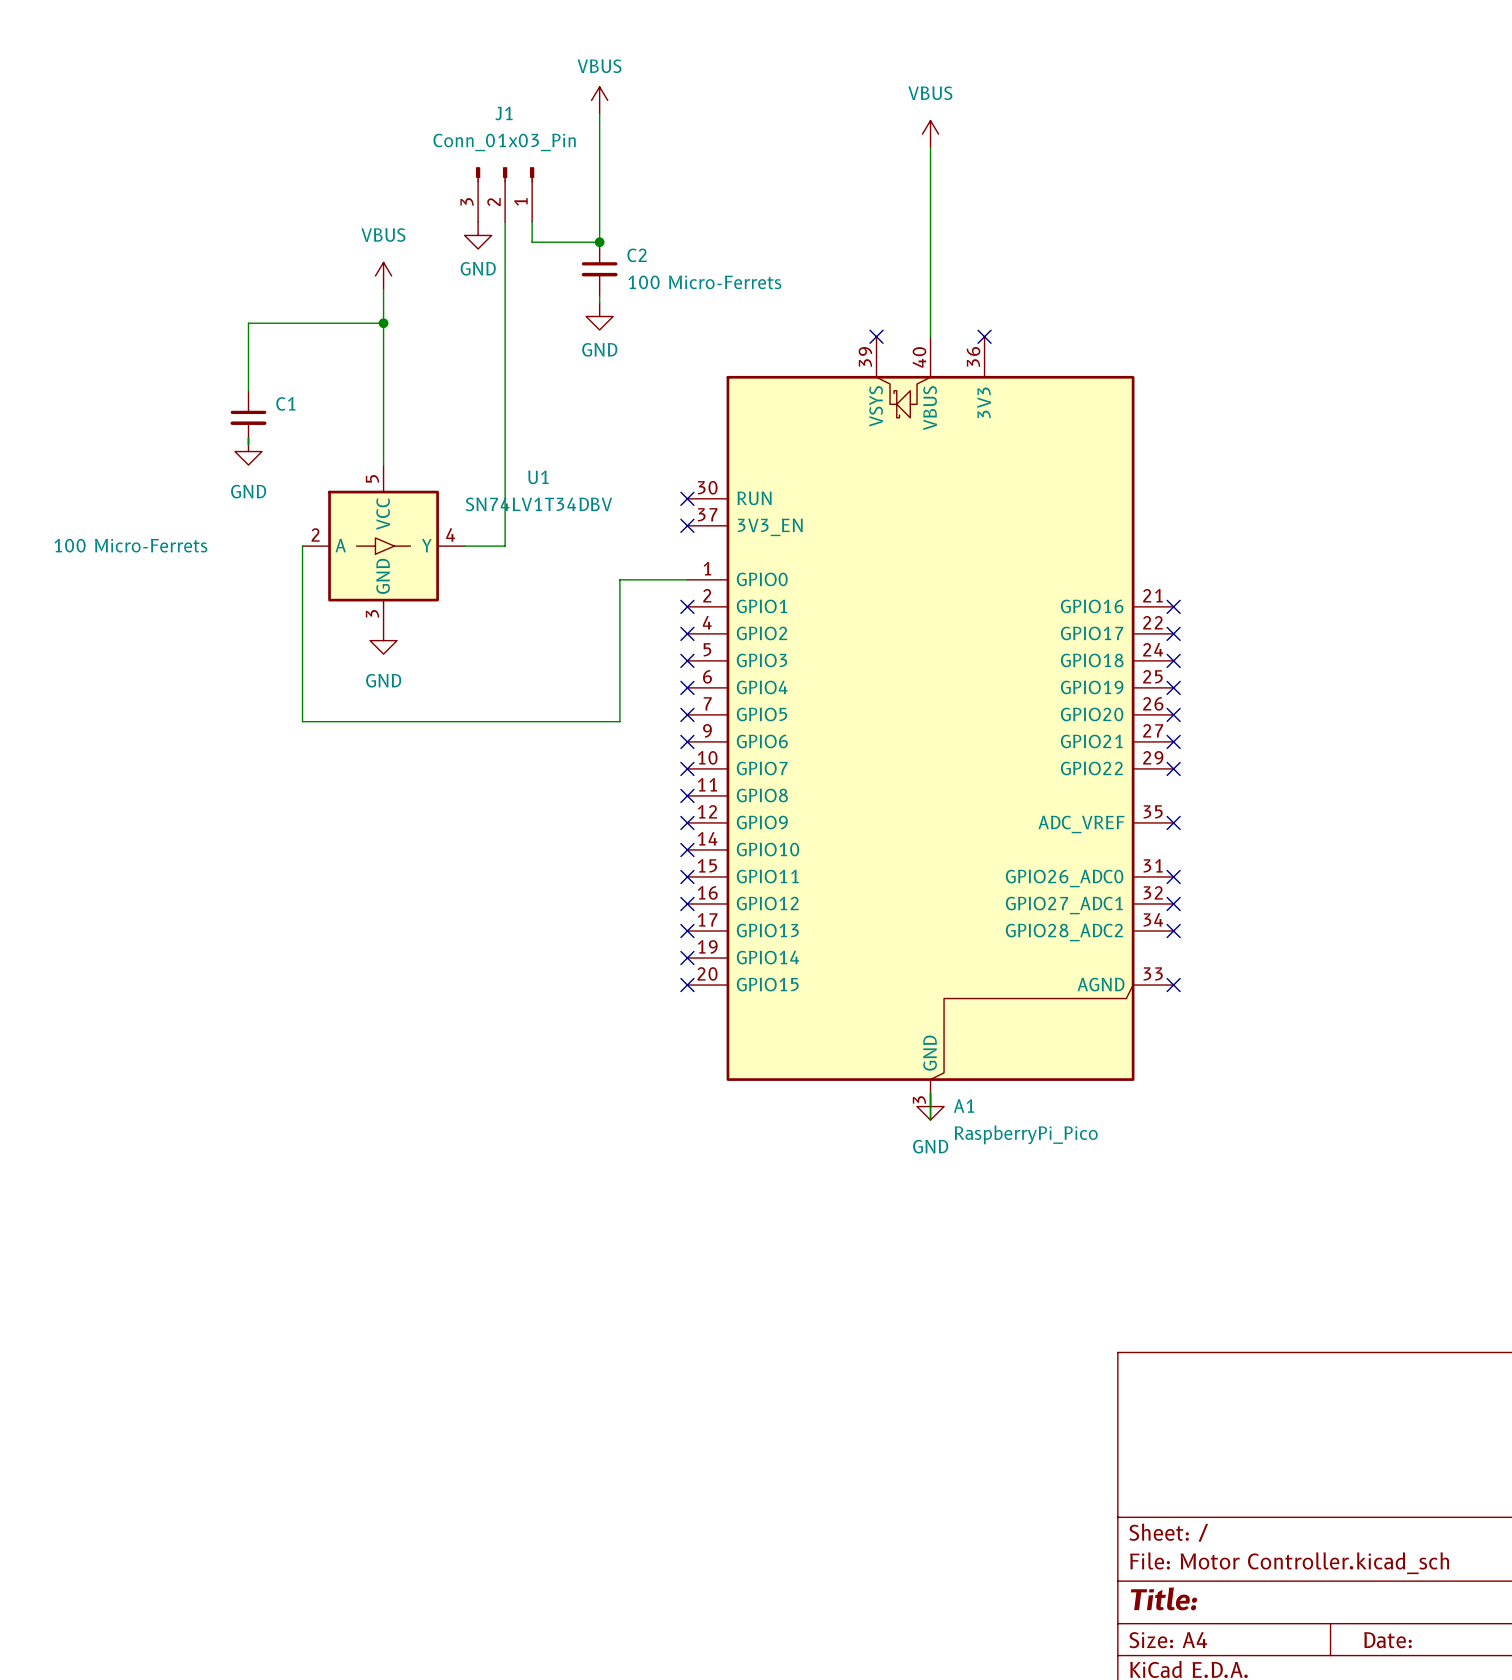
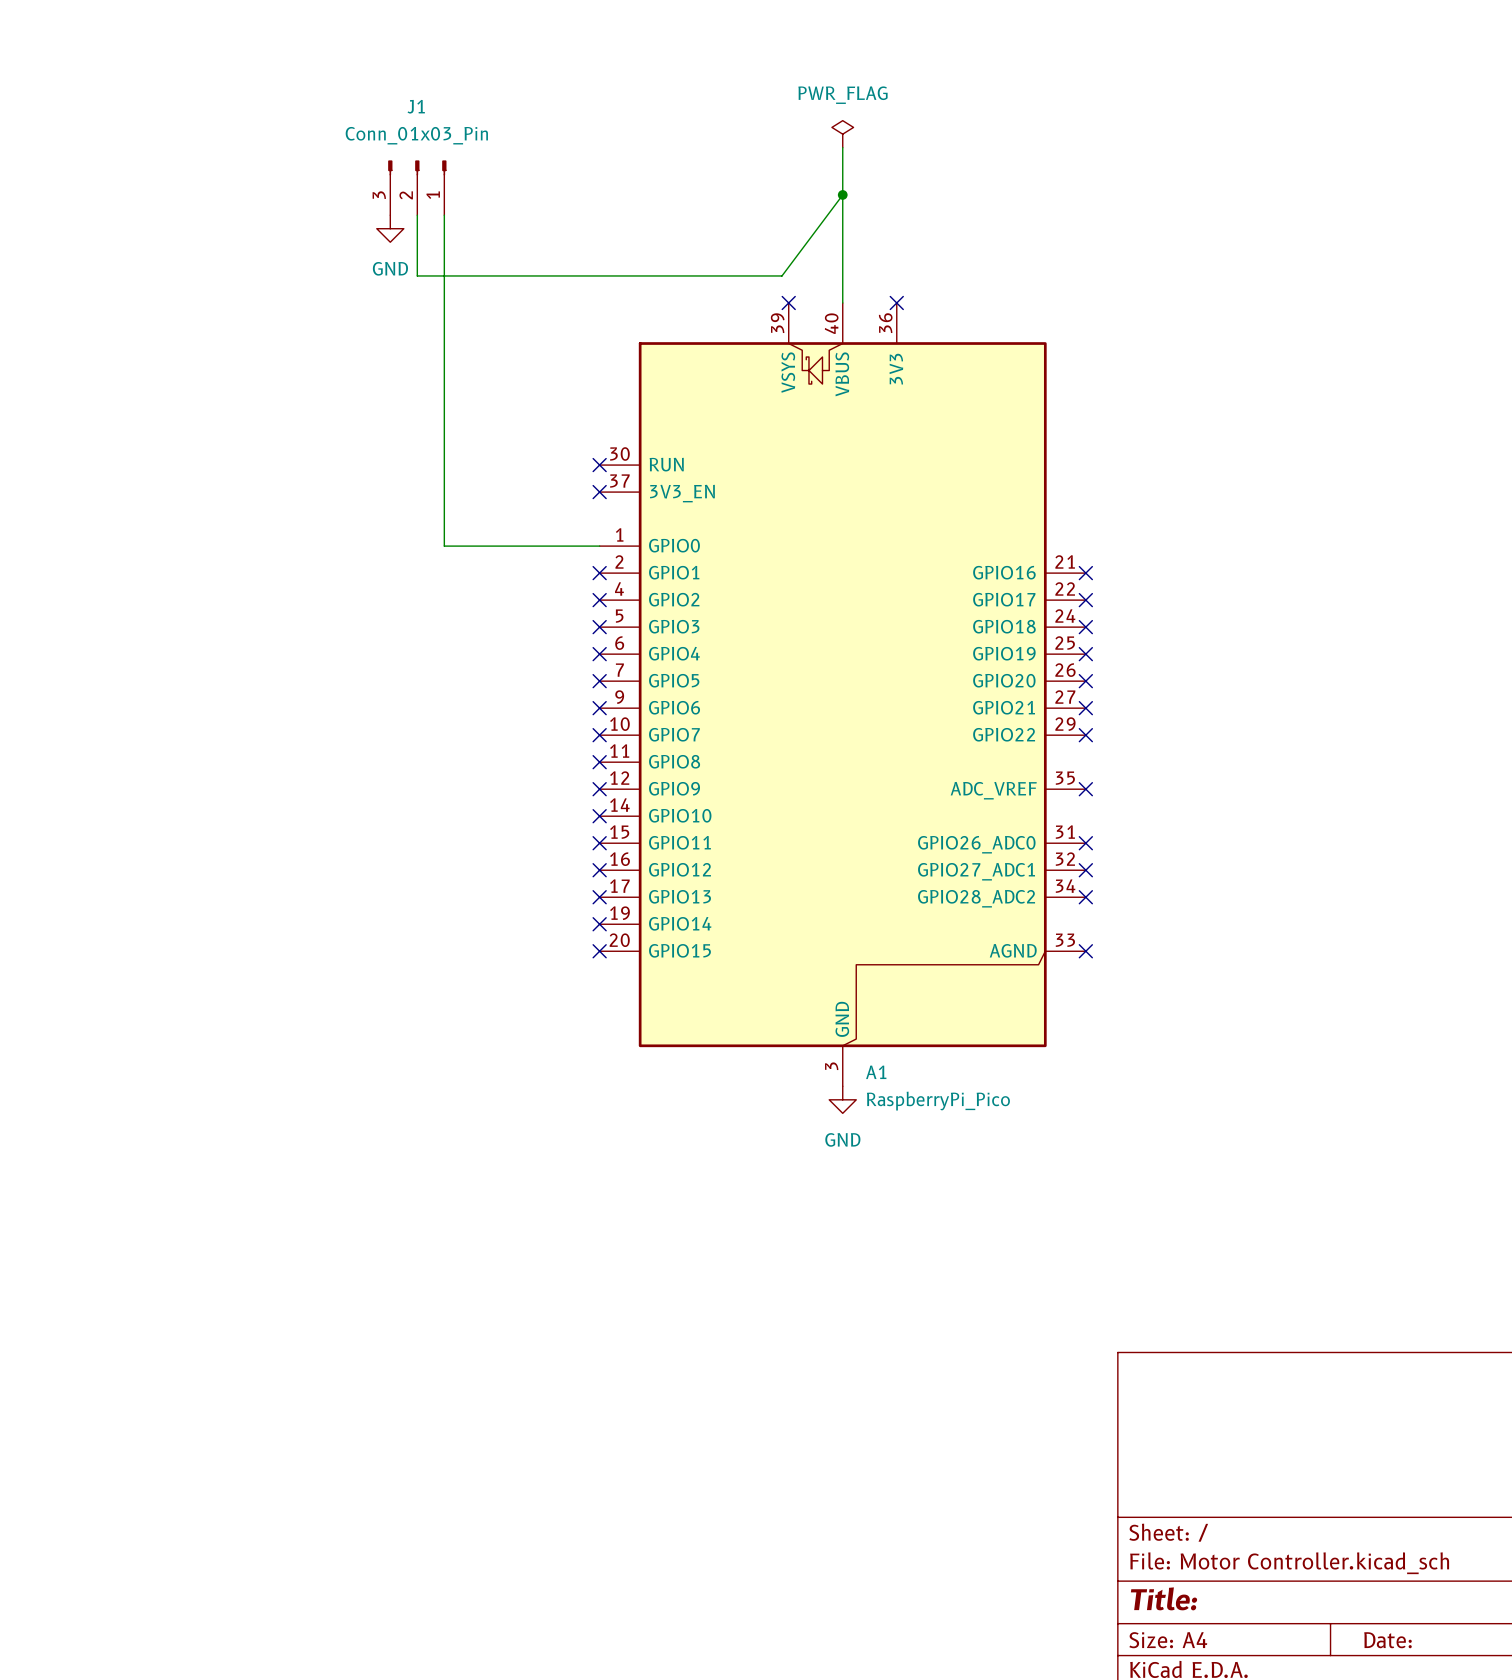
power symbol: VBUS (599, 100) -> none
wire: (599, 113) (599, 242) (532, 242) (532, 221) -> none
power symbol: none -> PWR_FLAG (842, 134)
power symbol: VBUS (930, 134) -> none
wire: none -> (842, 147) (842, 302)
wire: (930, 147) (930, 336) -> none
J1 position: (505, 194) -> (417, 187)
wire: none -> (842, 194) (781, 275) (417, 275) (417, 215)
junction: none -> (842, 194)
wire: none -> (444, 215) (444, 546) (464, 546)
wire: (505, 221) (505, 546) -> (599, 546) (505, 546)
power symbol position: GND (478, 235) -> GND (390, 228)
junction: (599, 242) -> none
power symbol text position: GND (478, 268) -> GND (390, 268)
C2: 100 Micro-Ferrets (599, 269) -> none
power symbol: VBUS (383, 275) -> none
wire: (383, 289) (383, 465) -> none
wire: (599, 296) (599, 302) -> none
no-connect mark: none -> (788, 302)
power symbol: GND (599, 316) -> none
wire: (383, 323) (248, 323) (248, 390) -> none
junction: (383, 323) -> none
no-connect mark position: (876, 336) -> (896, 302)
no-connect mark: (984, 336) -> none
C1: 100 Micro-Ferrets (248, 417) -> none
wire: (248, 438) (248, 444) -> none
power symbol: GND (248, 451) -> none
no-connect mark: none -> (599, 465)
no-connect mark: none -> (599, 492)
no-connect mark: (687, 498) -> none
no-connect mark: (687, 525) -> none
wire: (302, 546) (302, 721) (619, 721) (619, 579) (687, 579) -> none
U1: SN74LV1T34DBV (383, 546) -> none
no-connect mark: none -> (599, 573)
no-connect mark: none -> (1085, 573)
no-connect mark: none -> (599, 600)
no-connect mark: none -> (1085, 600)
no-connect mark: (687, 606) -> none
no-connect mark: (1173, 606) -> none
no-connect mark: none -> (599, 627)
no-connect mark: none -> (1085, 627)
no-connect mark: (687, 633) -> none
no-connect mark: (1173, 633) -> none
power symbol: GND (383, 640) -> none
no-connect mark: none -> (599, 654)
no-connect mark: none -> (1085, 654)
no-connect mark: (687, 660) -> none
no-connect mark: (1173, 660) -> none
no-connect mark: none -> (599, 681)
no-connect mark: none -> (1085, 681)
no-connect mark: (687, 687) -> none
no-connect mark: (1173, 687) -> none
no-connect mark: none -> (599, 708)
no-connect mark: none -> (1085, 708)
no-connect mark: (687, 714) -> none
no-connect mark: (1173, 714) -> none
A1 position: (930, 728) -> (842, 694)
no-connect mark: none -> (599, 735)
no-connect mark: none -> (1085, 735)
no-connect mark: (687, 741) -> none
no-connect mark: (1173, 741) -> none
no-connect mark: none -> (599, 762)
no-connect mark: (687, 768) -> none
no-connect mark: (1173, 768) -> none
no-connect mark: none -> (599, 789)
no-connect mark: none -> (1085, 789)
no-connect mark: (687, 795) -> none
no-connect mark: none -> (599, 816)
no-connect mark: (687, 822) -> none
no-connect mark: (1173, 822) -> none
no-connect mark: none -> (599, 843)
no-connect mark: none -> (1085, 843)
no-connect mark: (687, 849) -> none
no-connect mark: none -> (599, 870)
no-connect mark: none -> (1085, 870)
no-connect mark: (687, 876) -> none
no-connect mark: (1173, 876) -> none
no-connect mark: none -> (599, 897)
no-connect mark: none -> (1085, 897)
no-connect mark: (687, 903) -> none
no-connect mark: (1173, 903) -> none
no-connect mark: none -> (599, 924)
no-connect mark: (687, 931) -> none
no-connect mark: (1173, 931) -> none
no-connect mark: none -> (599, 951)
no-connect mark: none -> (1085, 951)
no-connect mark: (687, 958) -> none
no-connect mark: (687, 985) -> none
no-connect mark: (1173, 985) -> none
wire: (930, 1093) (930, 1120) -> none
power symbol position: GND (930, 1106) -> GND (842, 1099)

